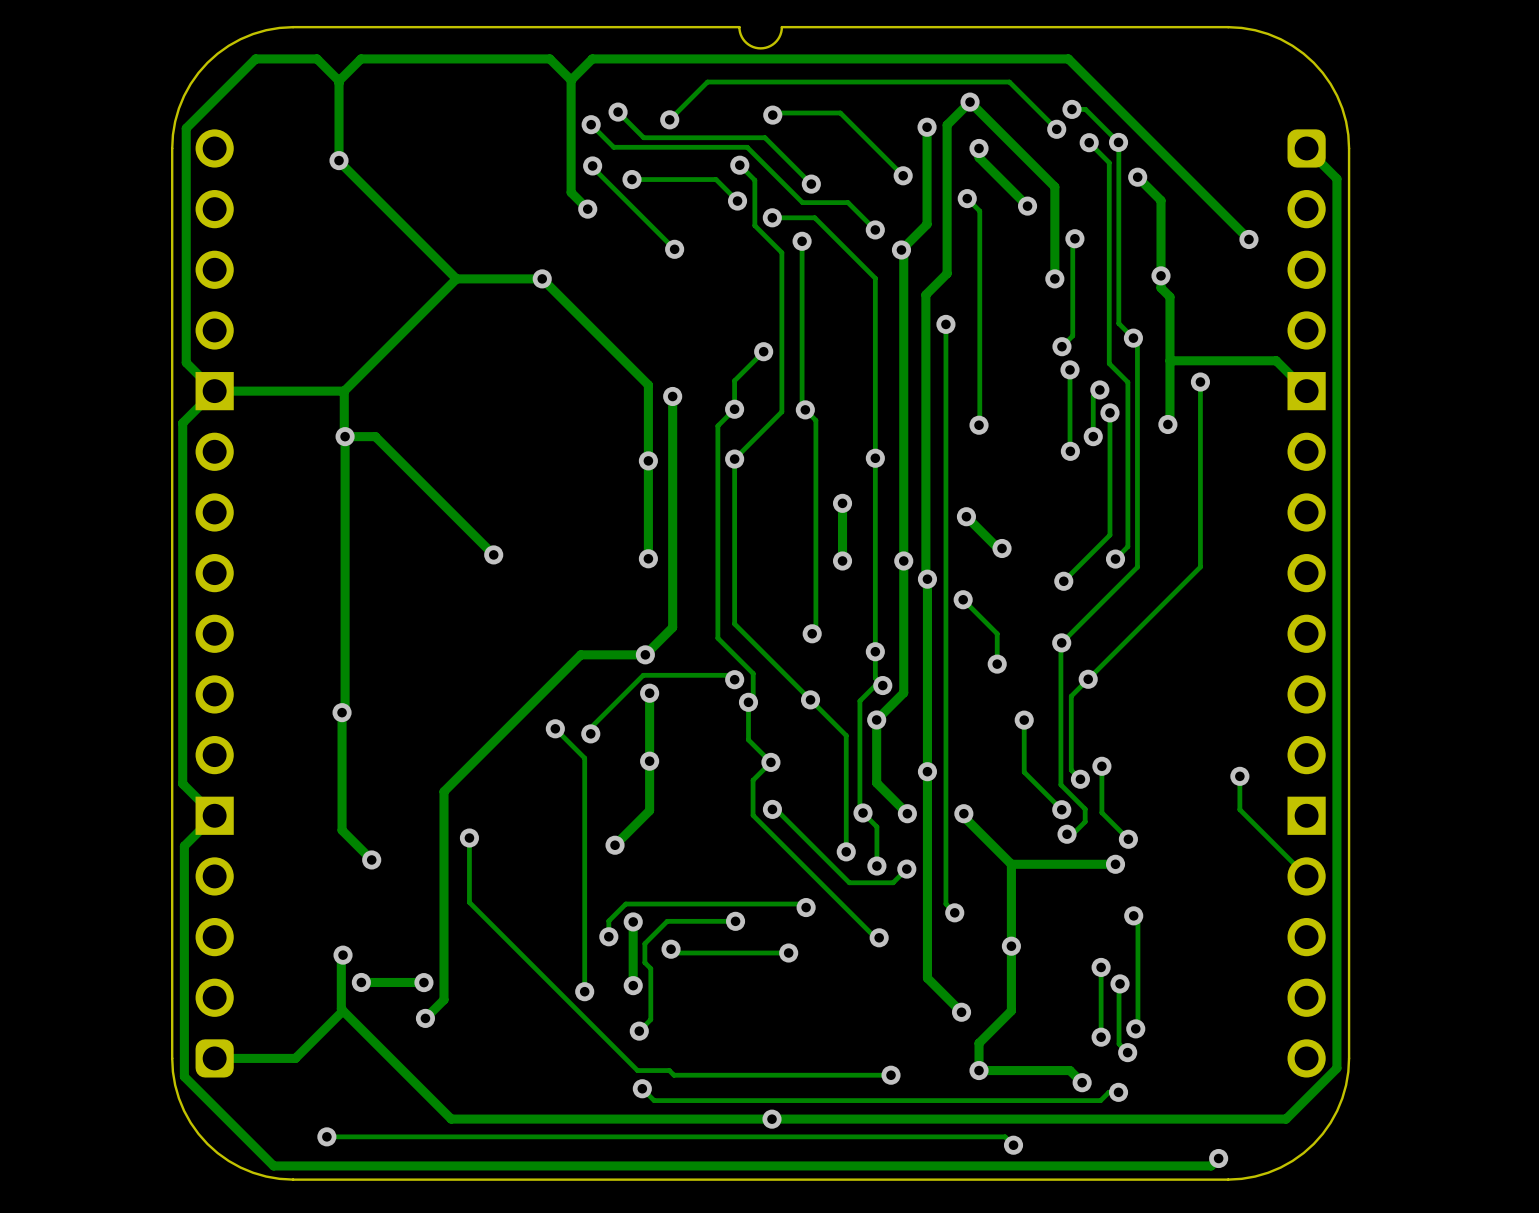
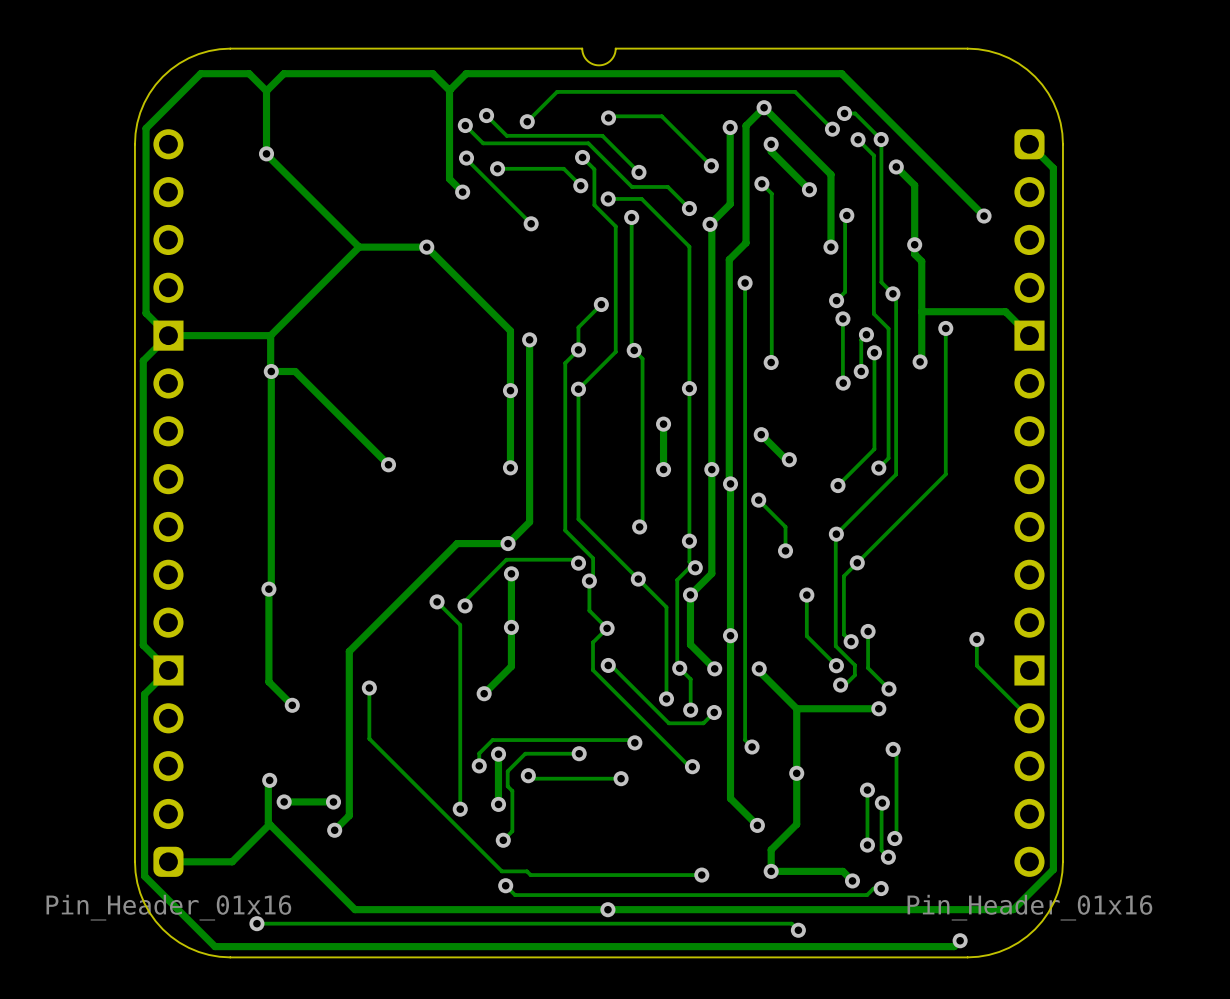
drawing: none -> [46, 894, 292, 921]
drawing: none -> [907, 894, 1153, 921]

